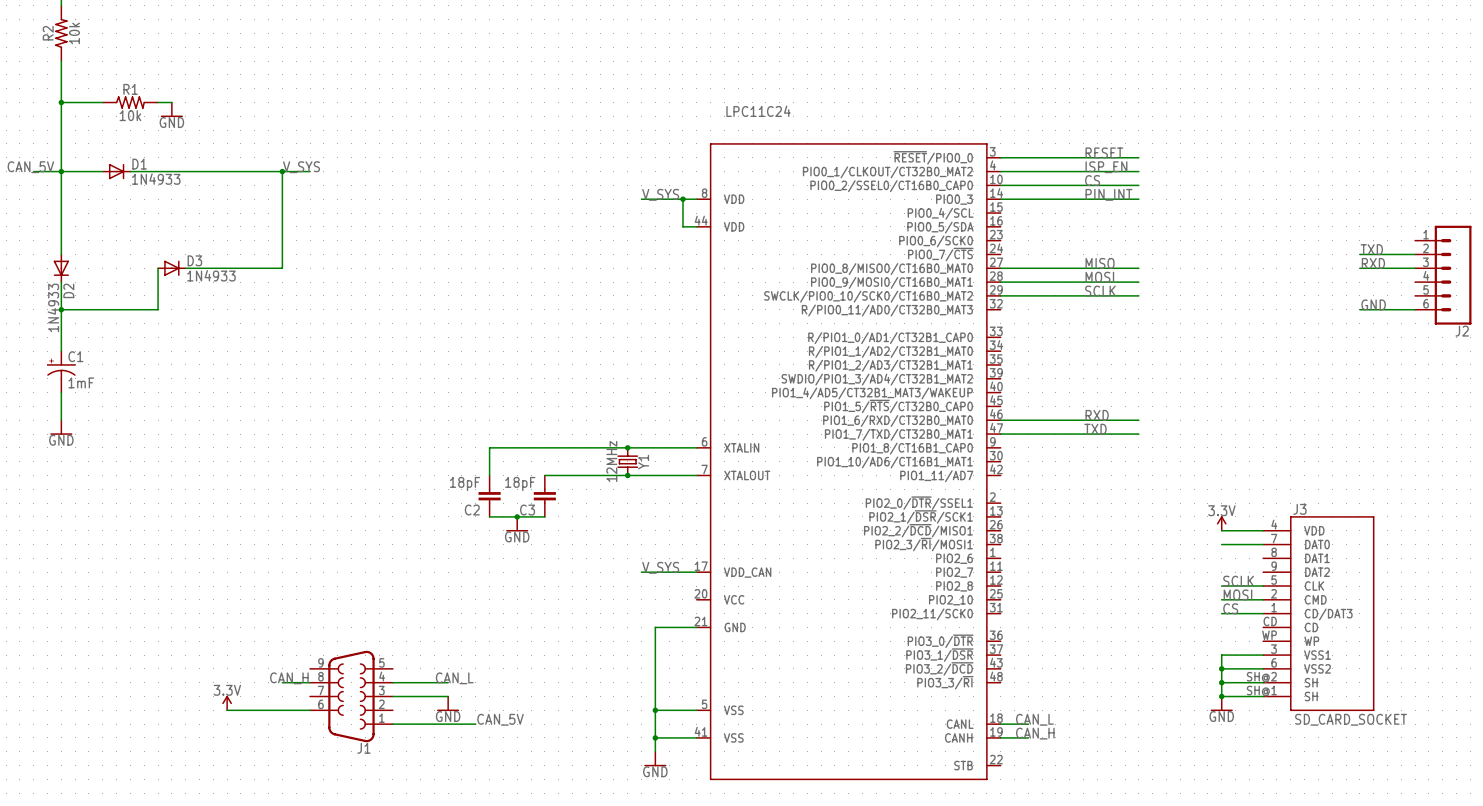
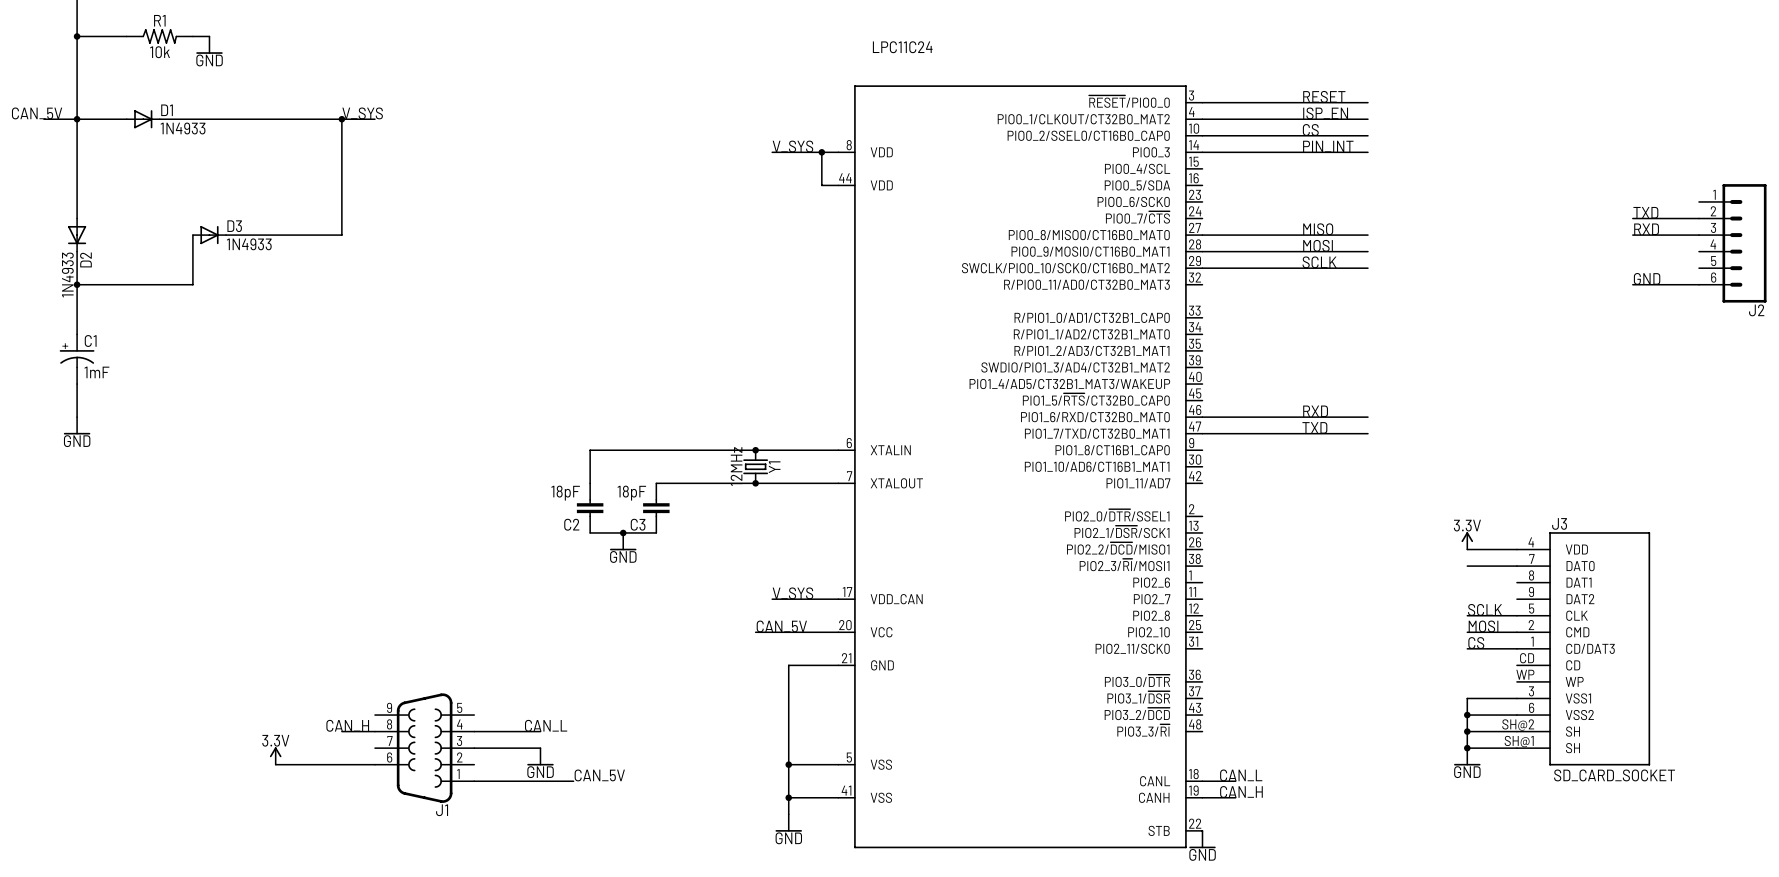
label: none -> CAN_5V (781, 626)
wire: none -> (755, 632) (838, 632)
power symbol: none -> GND (1202, 839)

